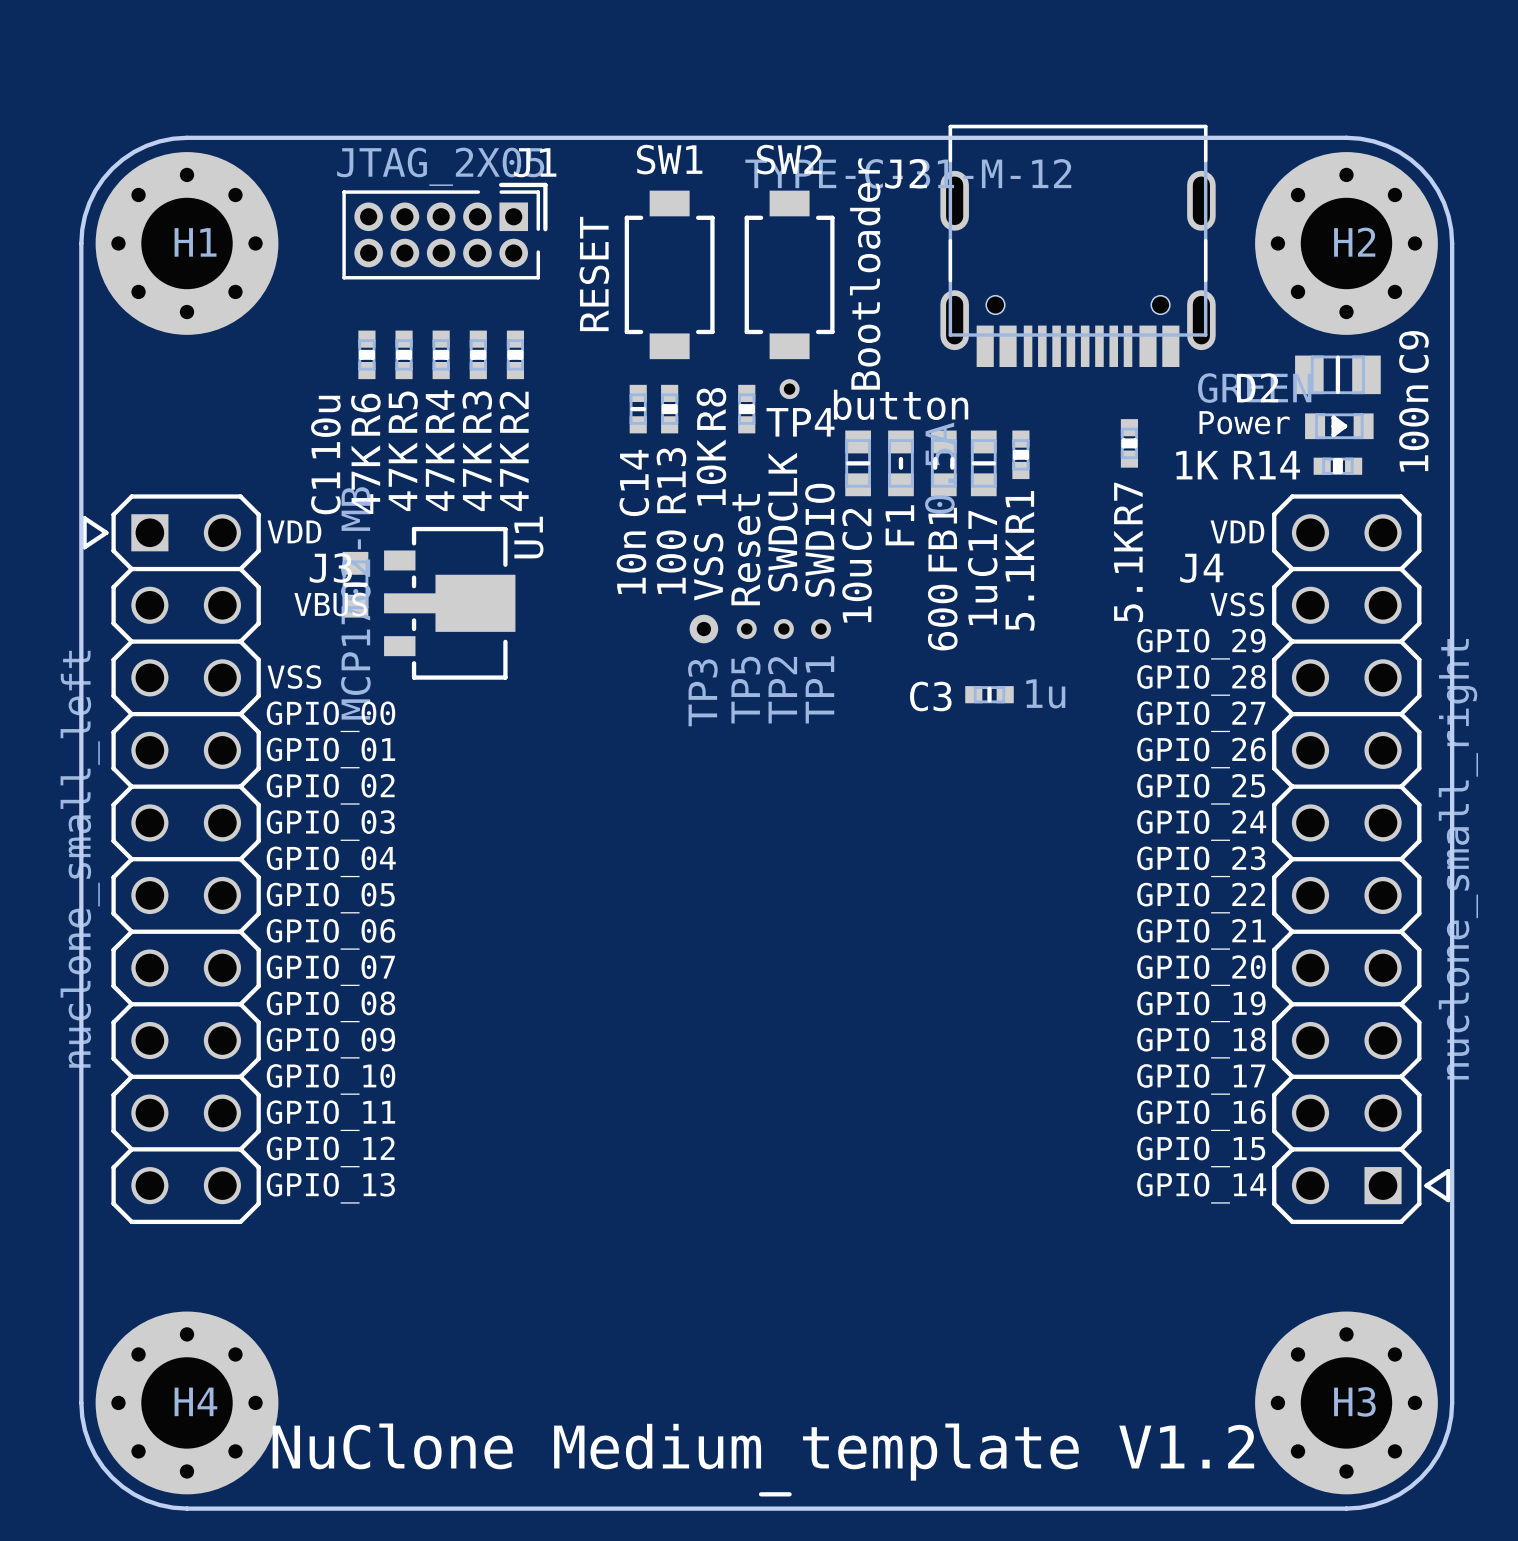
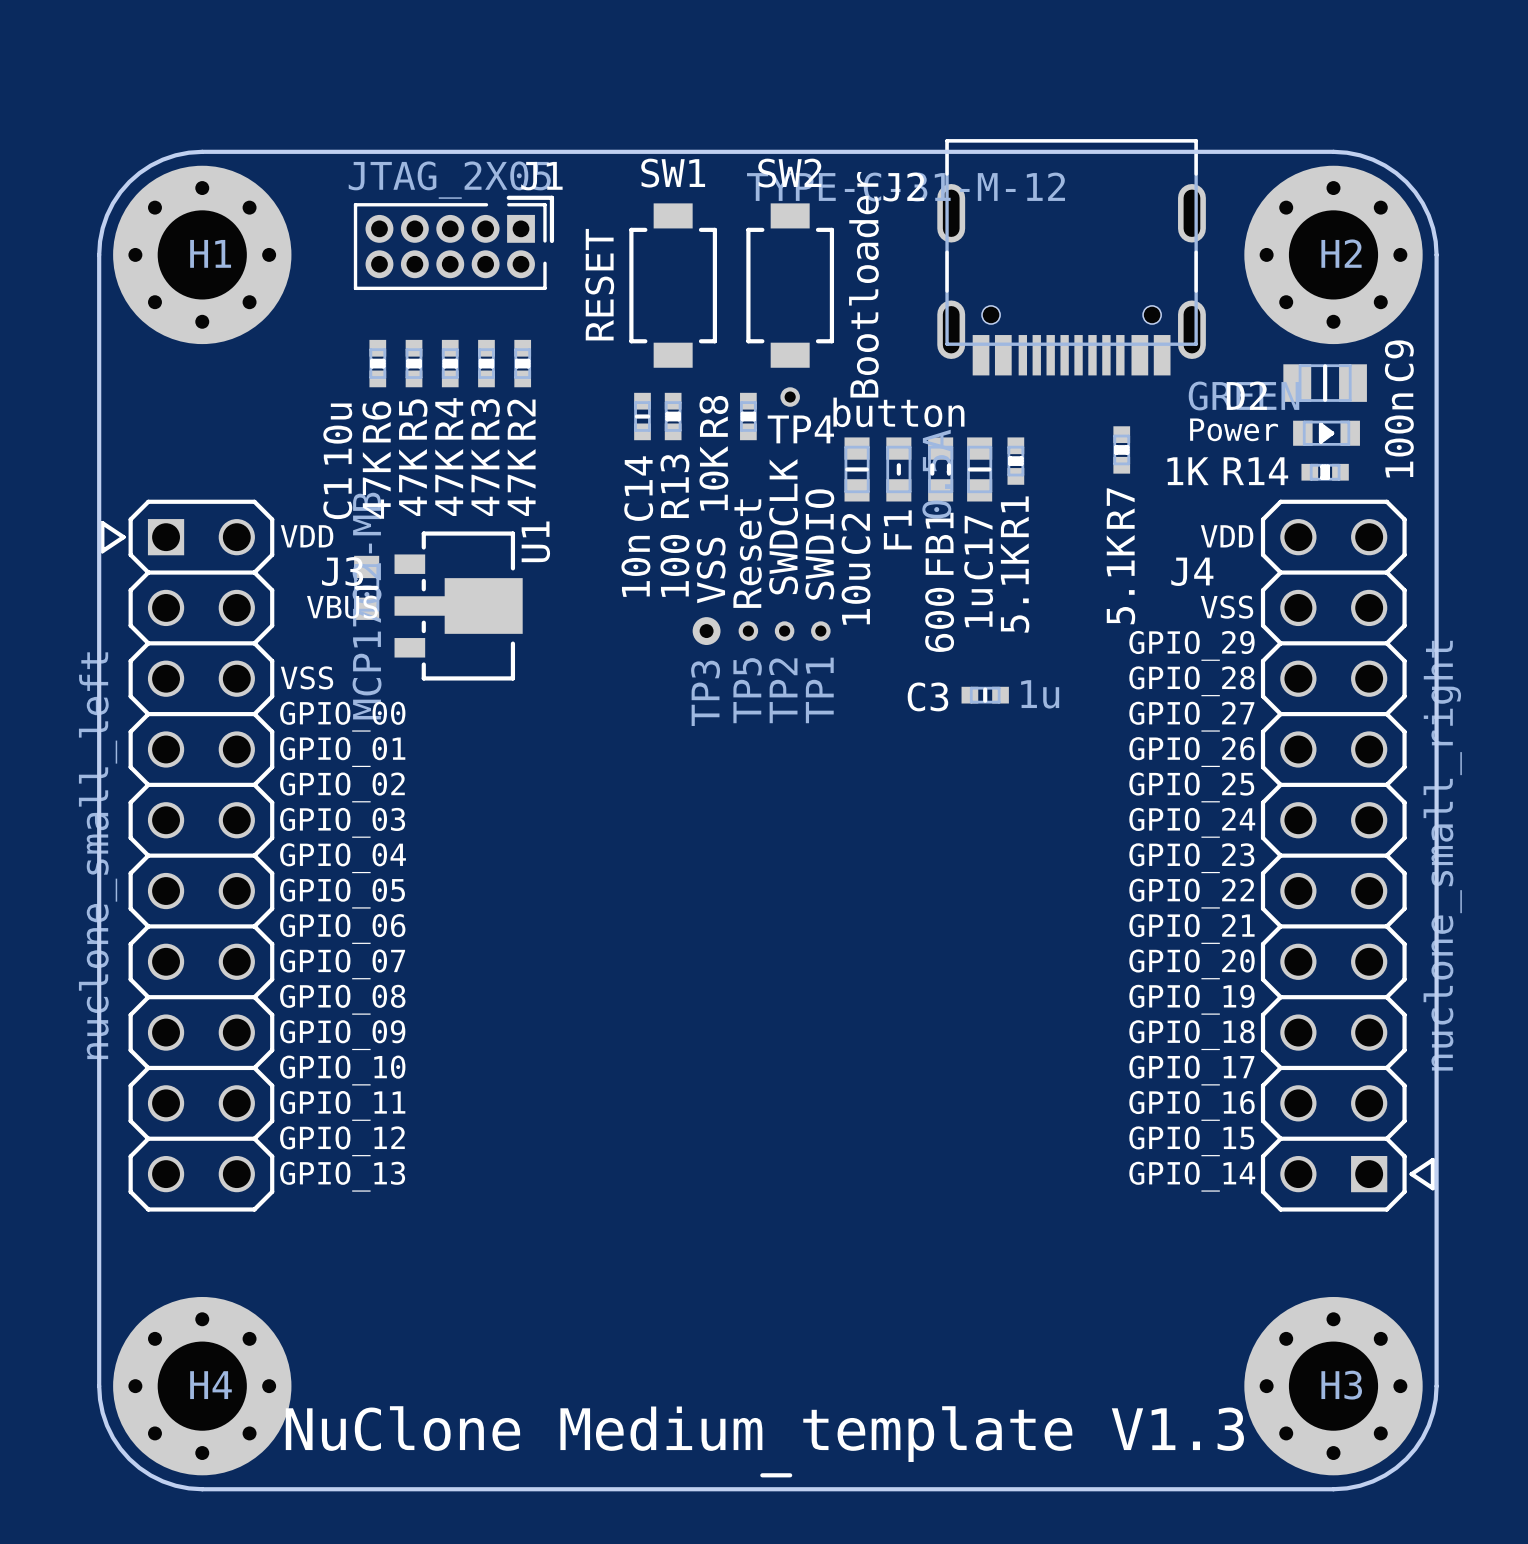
drawing shape: [272, 1423, 1255, 1497] -> [285, 1406, 1244, 1478]

